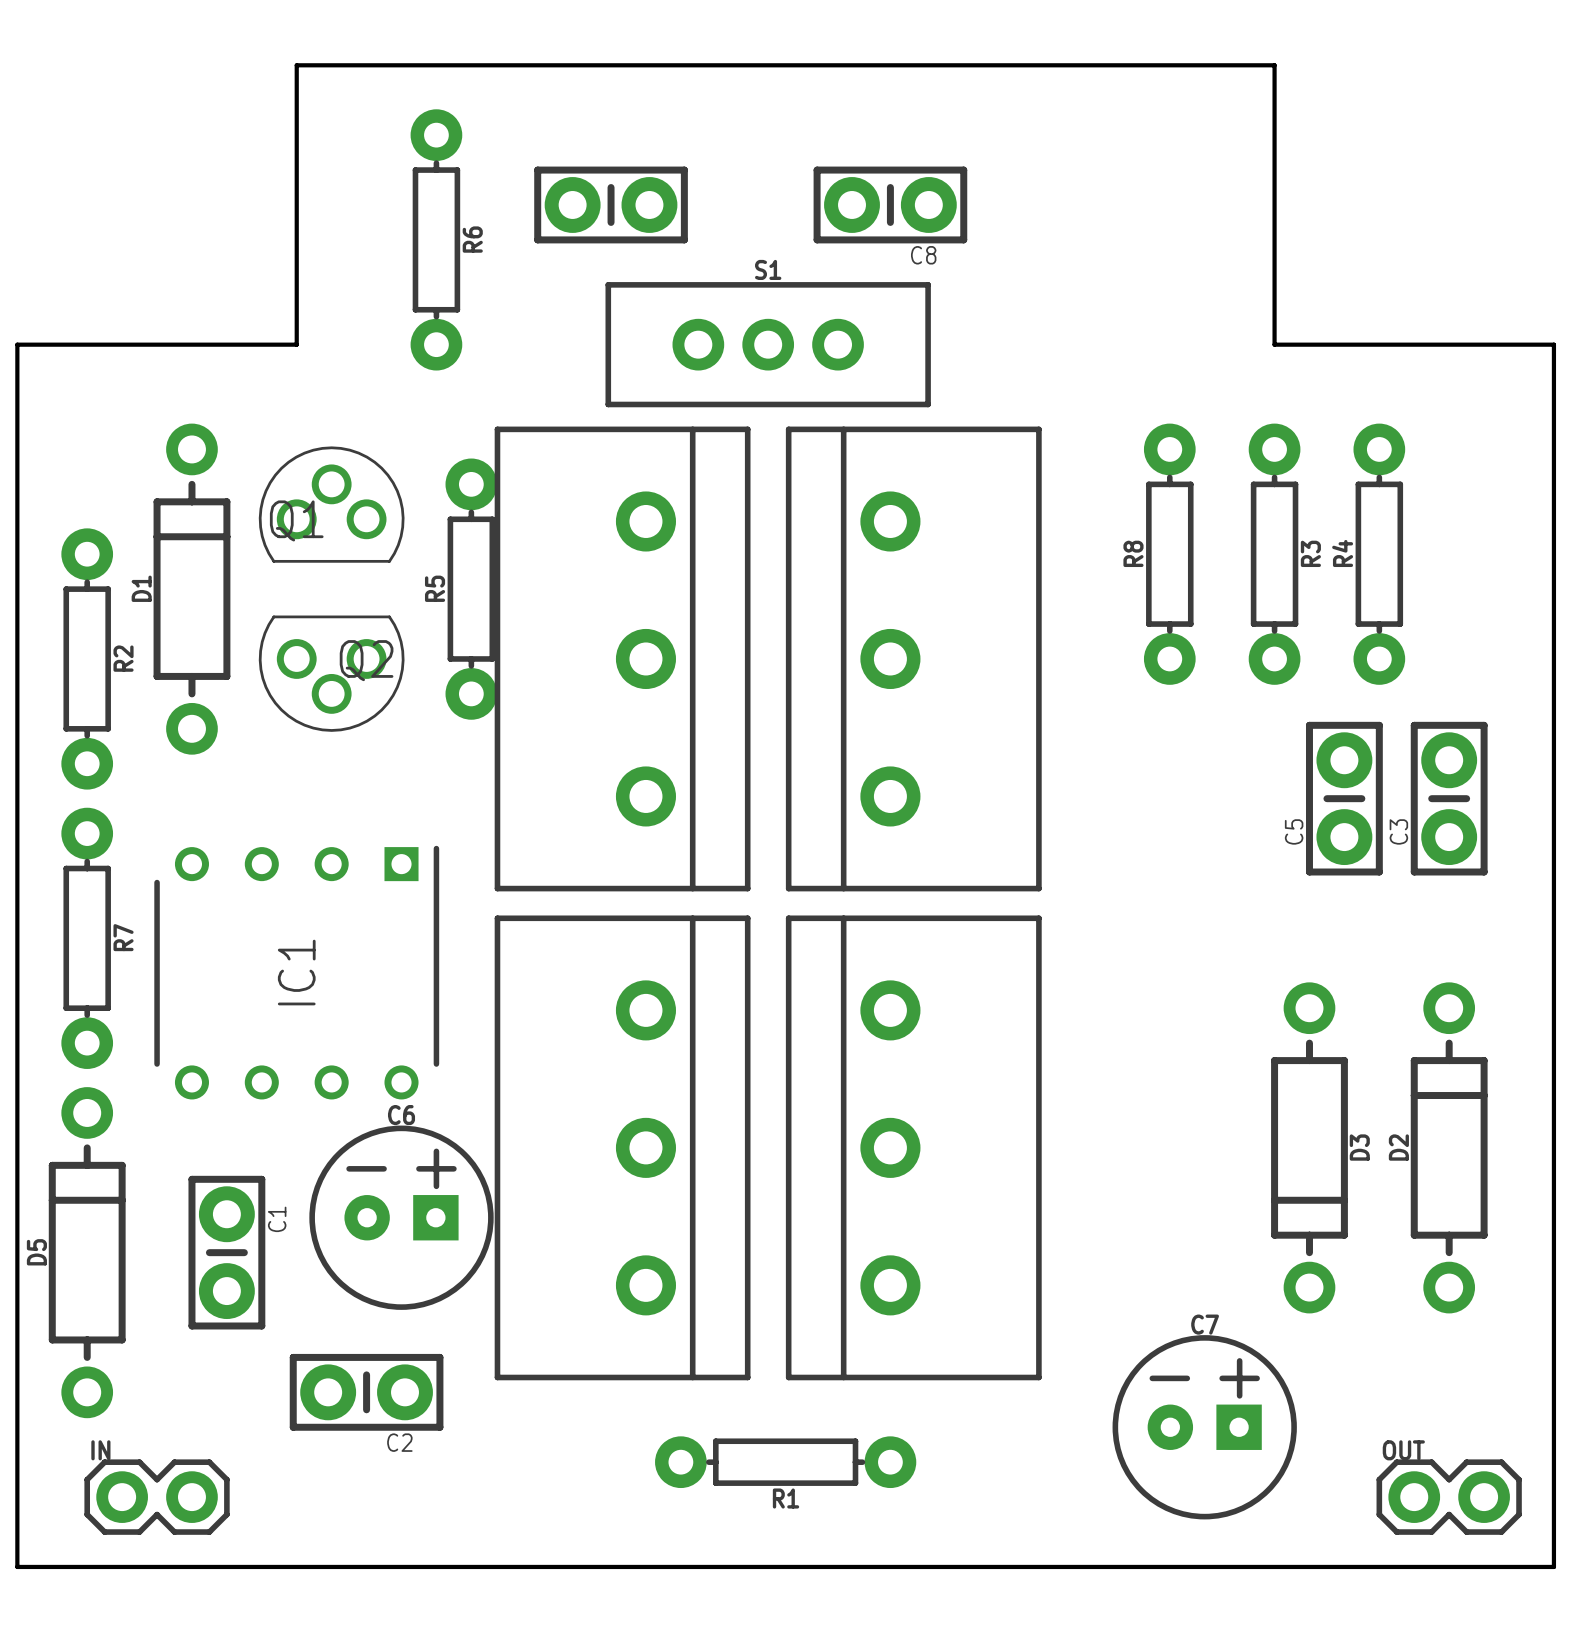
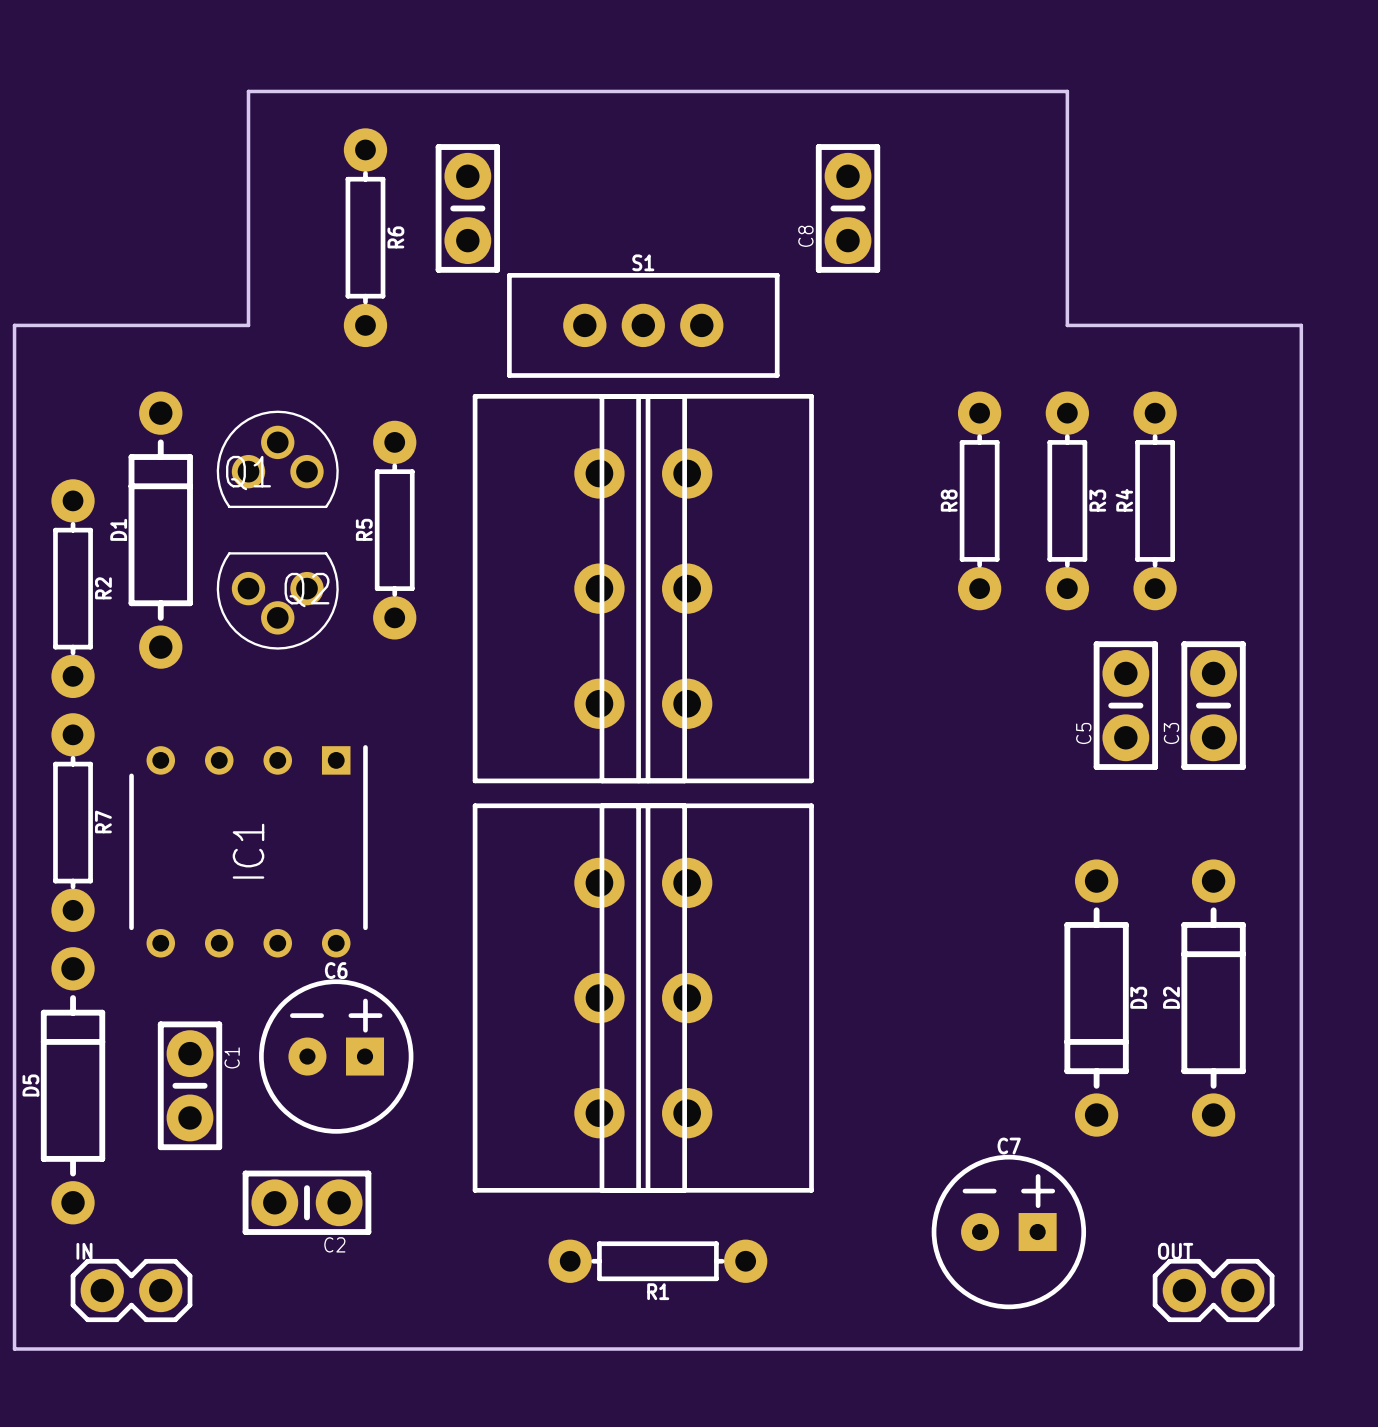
part rotation: 0° (611, 204) -> 90° clockwise (467, 208)
C8 rotation: 0° (890, 204) -> 90° clockwise (848, 208)
C8 position: (890, 204) -> (848, 208)
part position: (622, 658) -> (579, 588)
part position: (913, 658) -> (706, 588)
part position: (622, 1147) -> (579, 998)
part position: (913, 1147) -> (706, 998)

